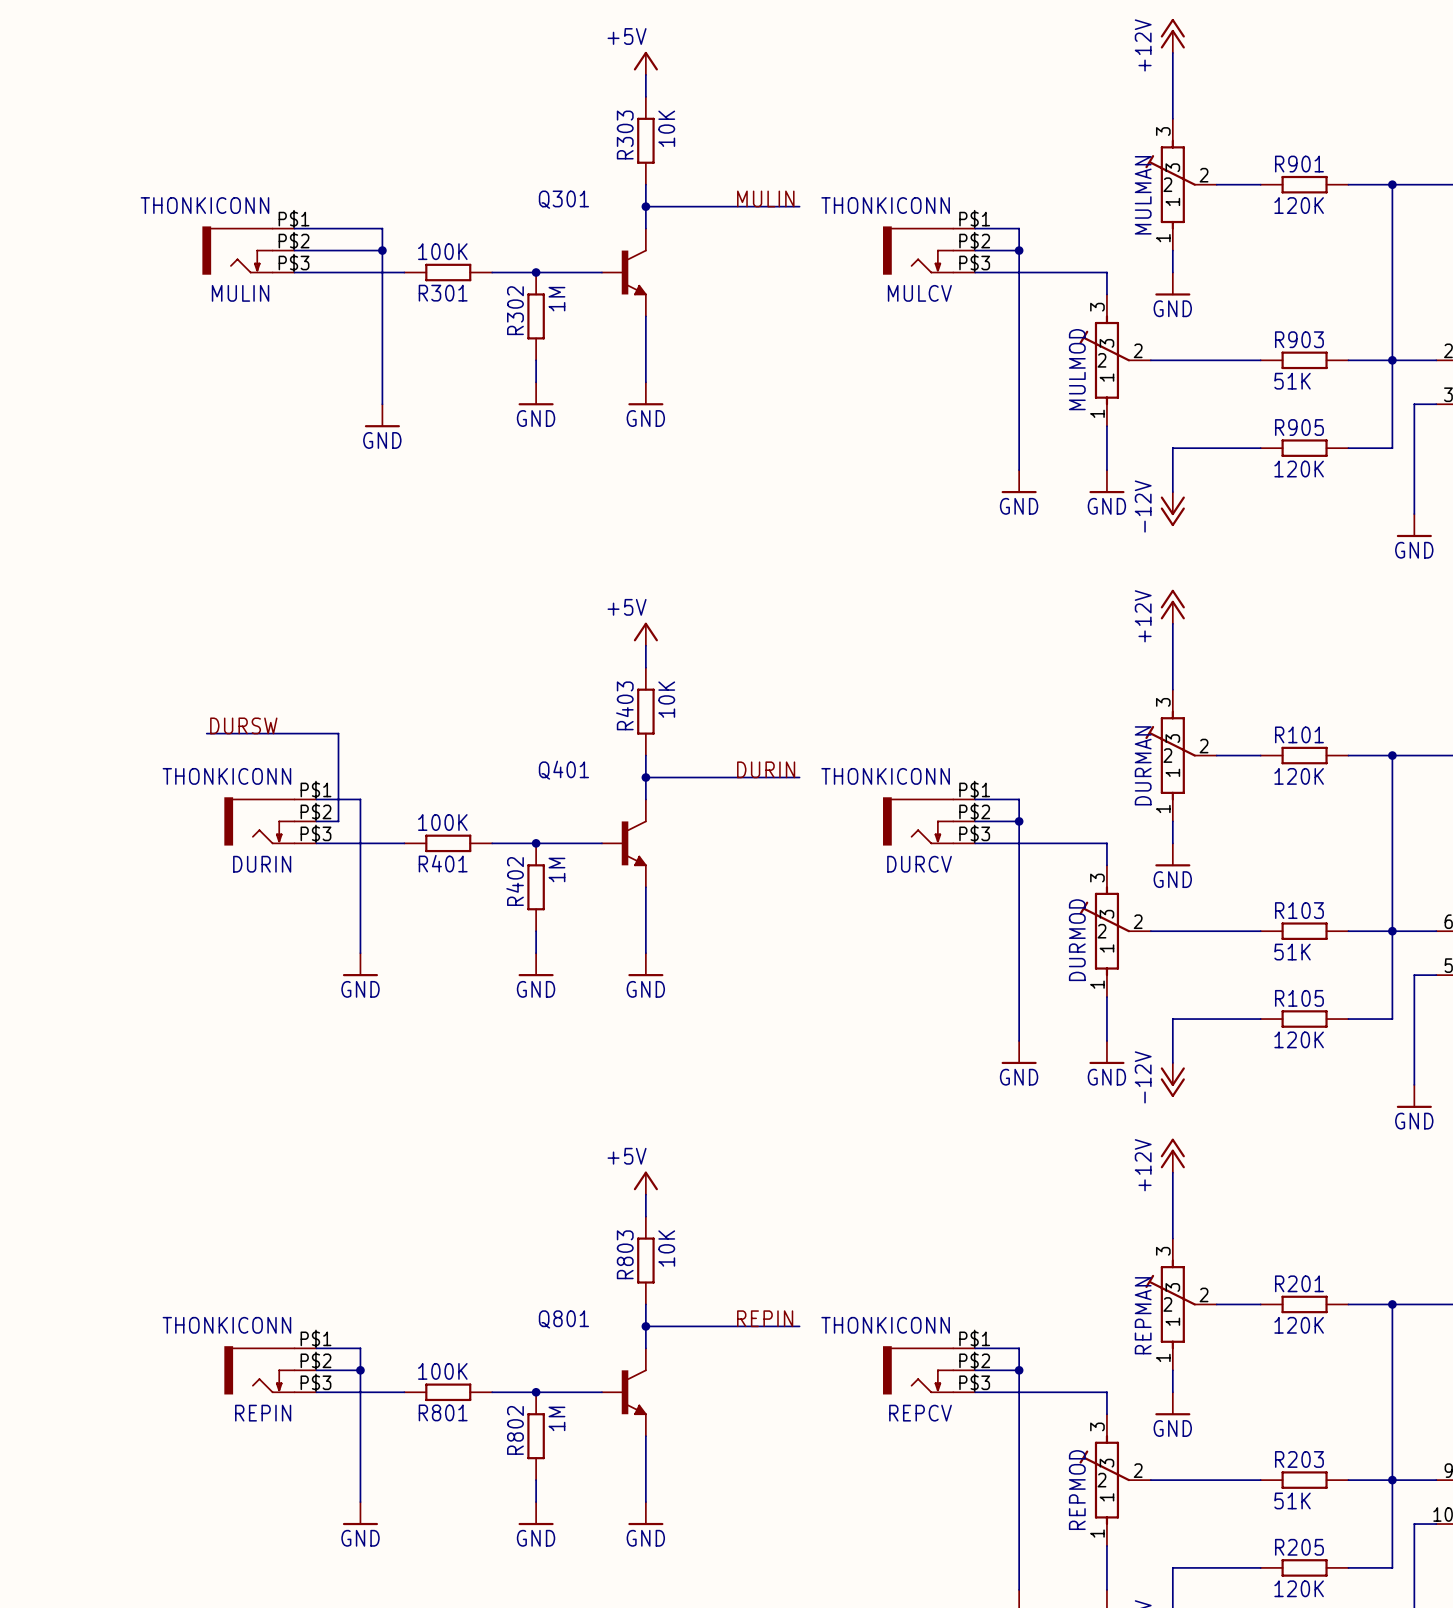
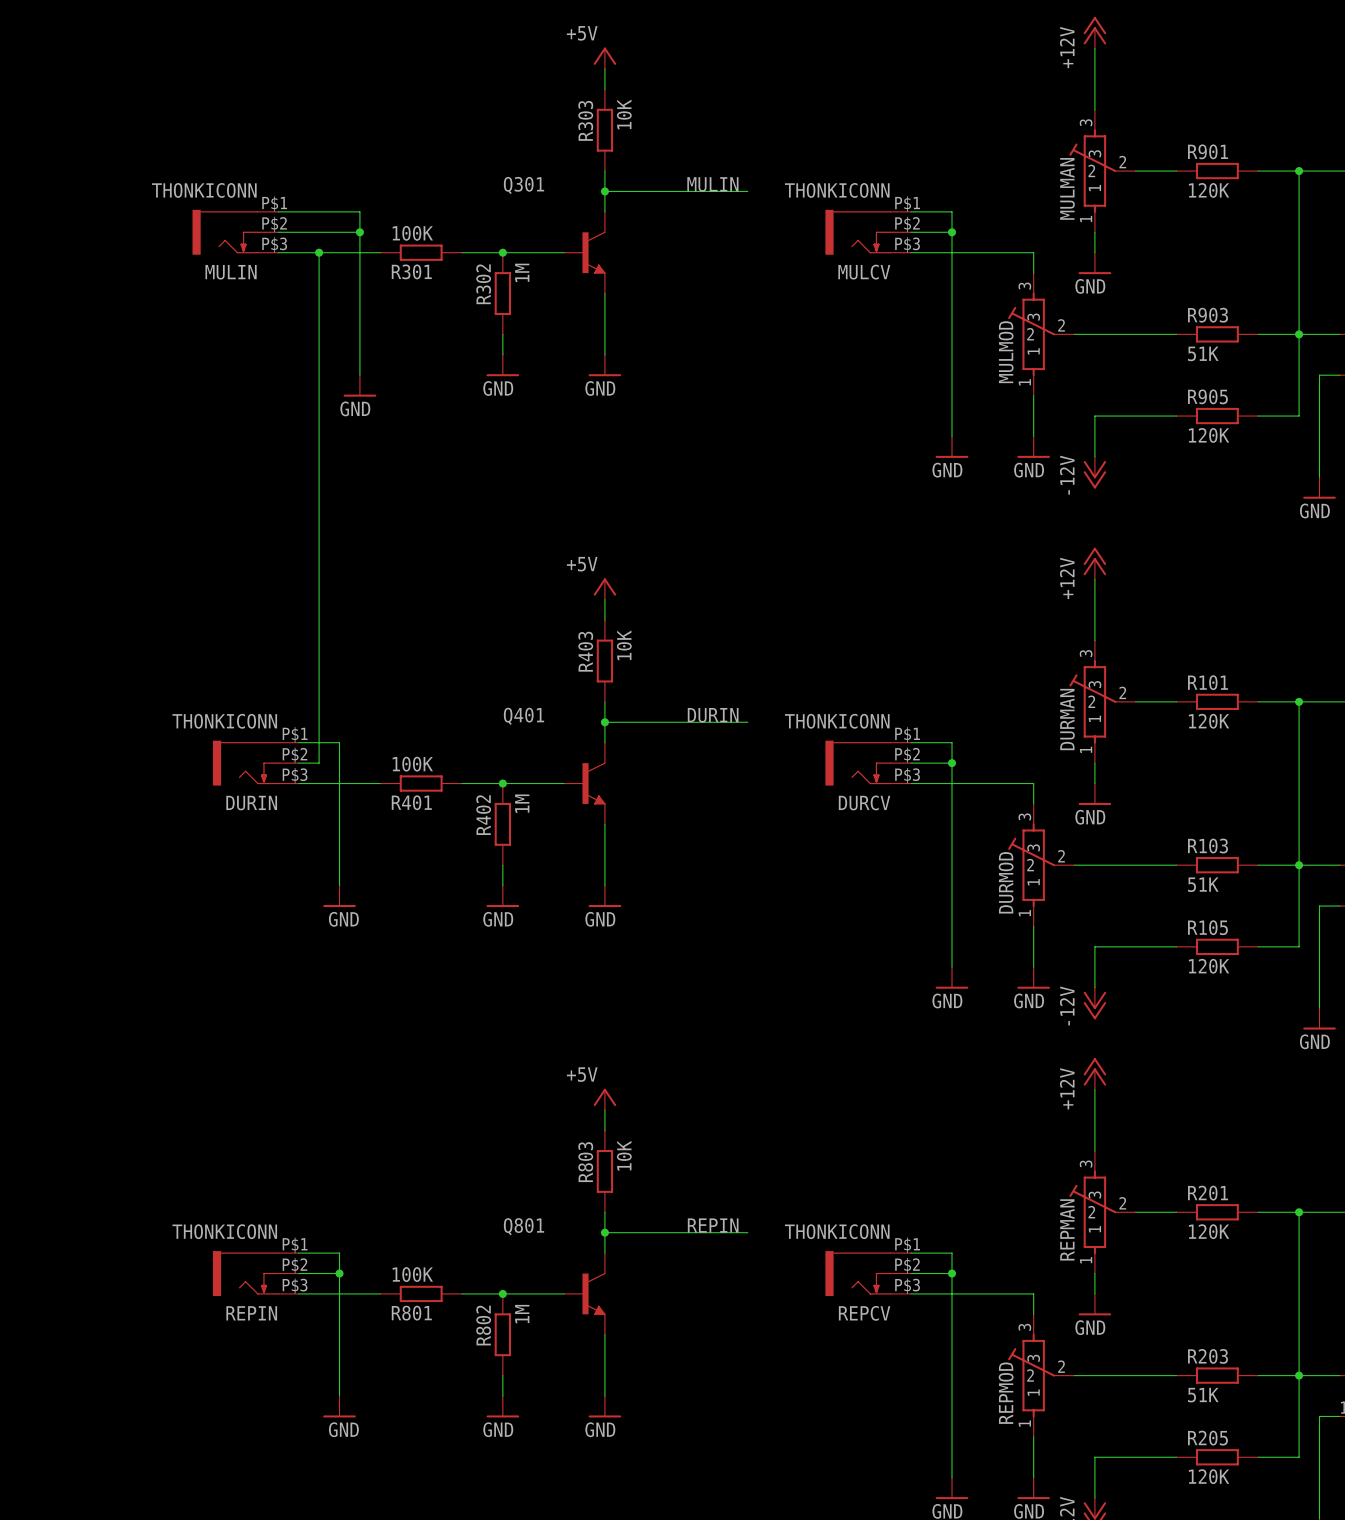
junction: none -> (319, 252)
label: DURSW (243, 725) -> none
wire: (206, 733) (338, 733) -> (319, 252) (319, 681)

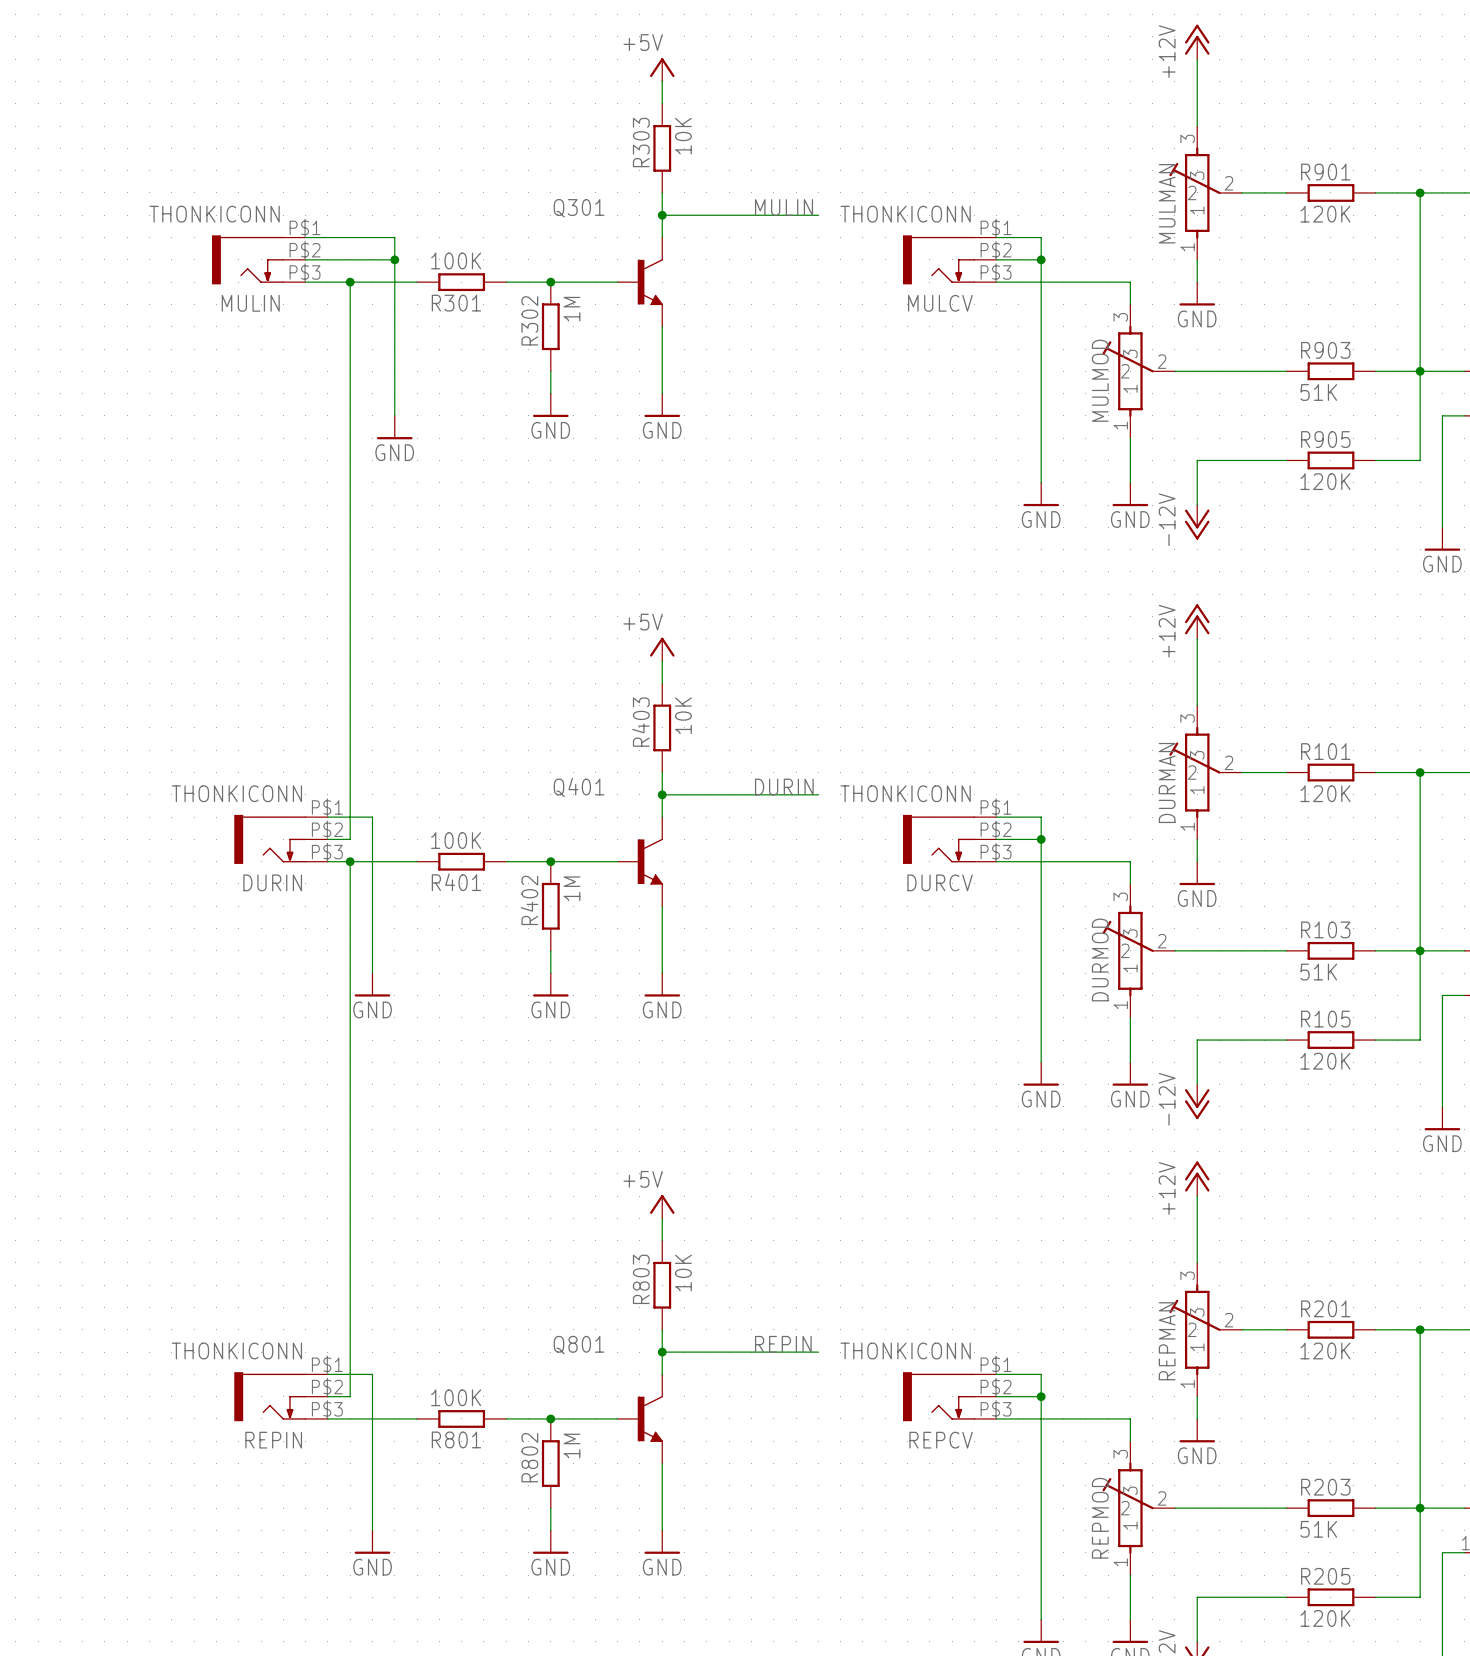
junction: none -> (350, 861)
wire: (319, 1273) (339, 1273) -> (350, 1396) (350, 861)
junction: (339, 1273) -> none

